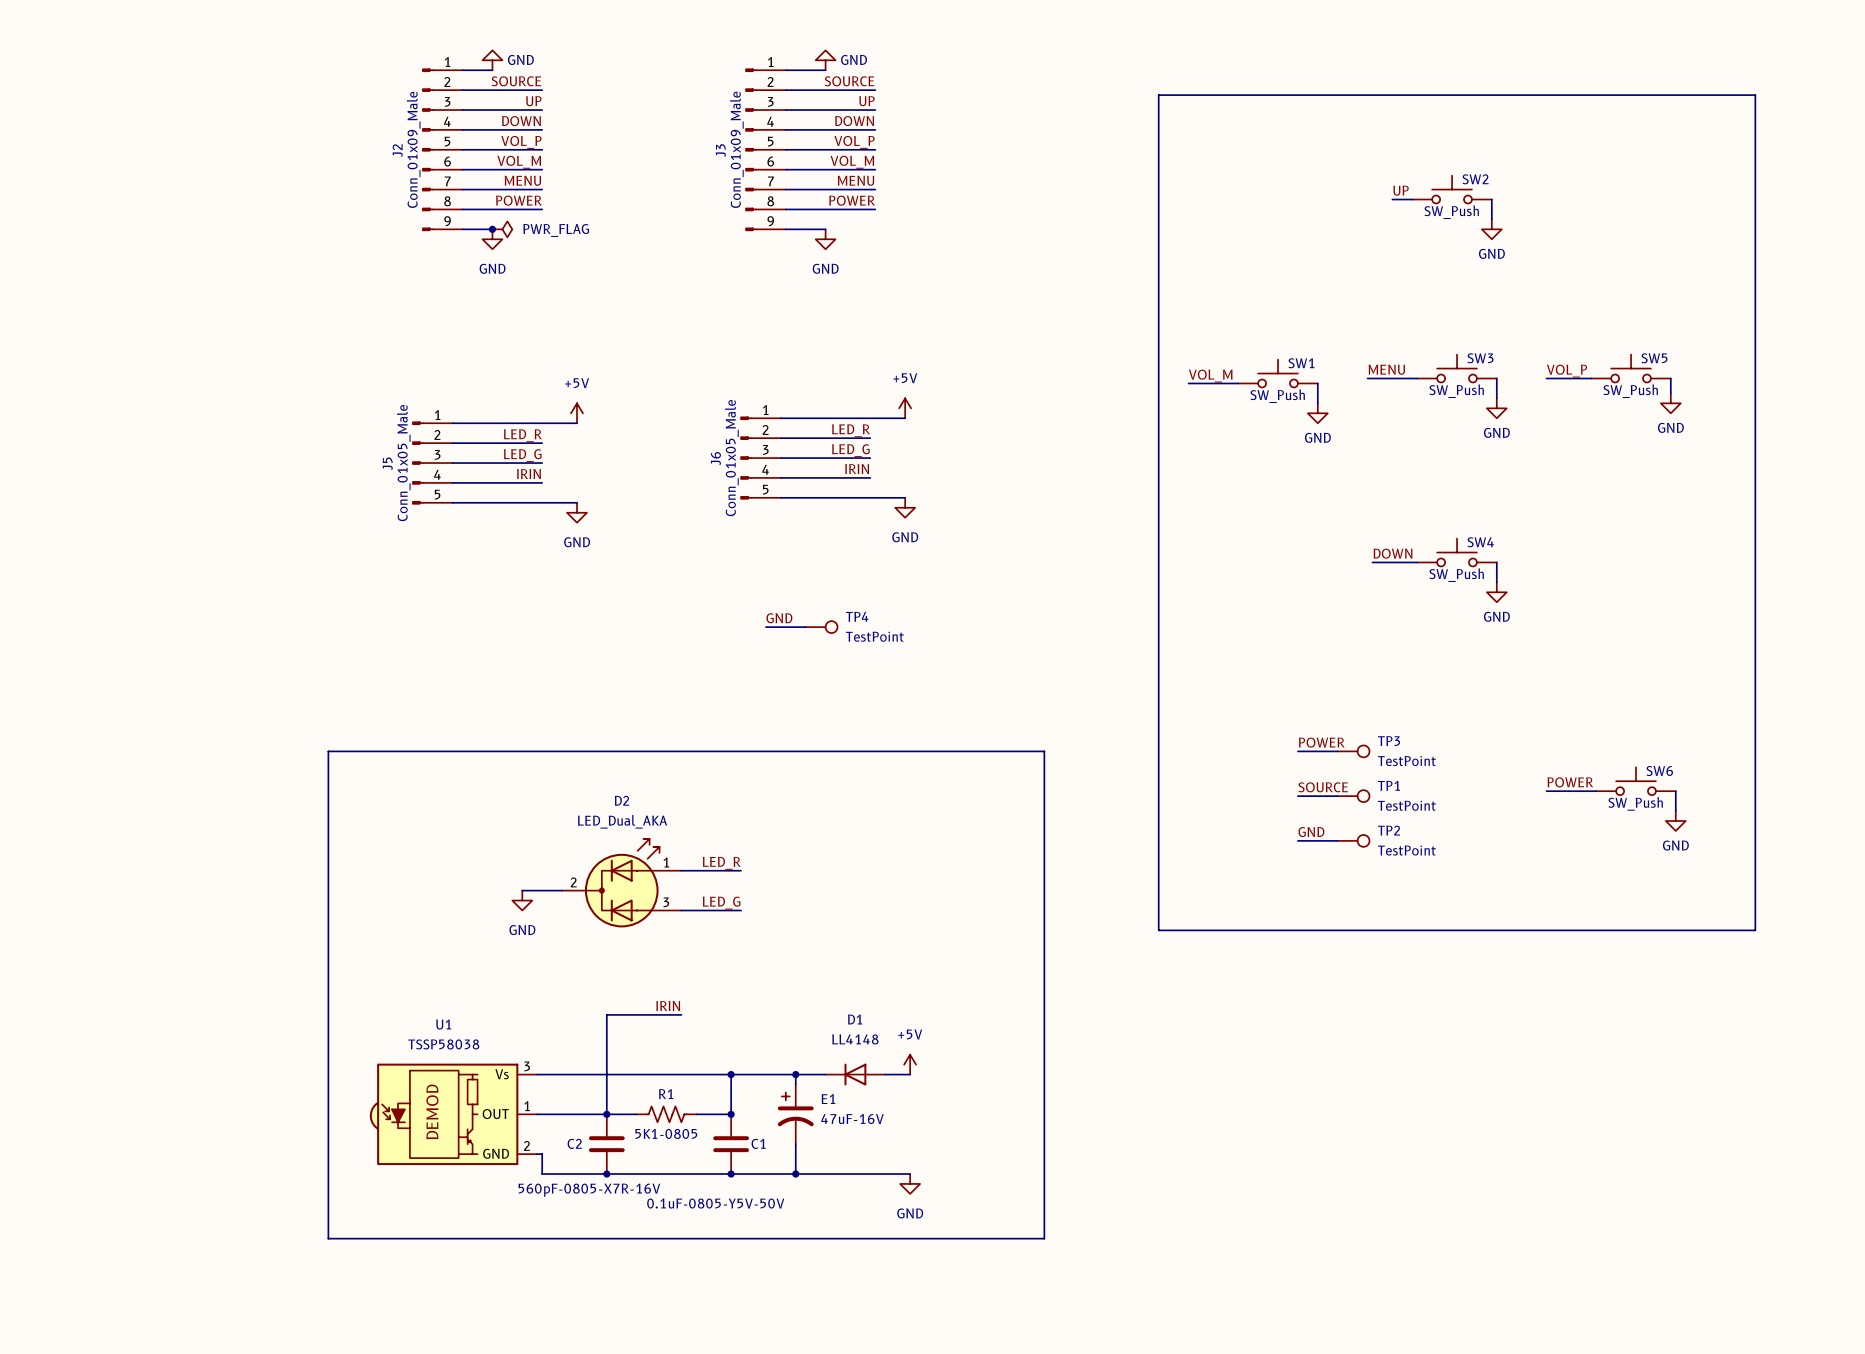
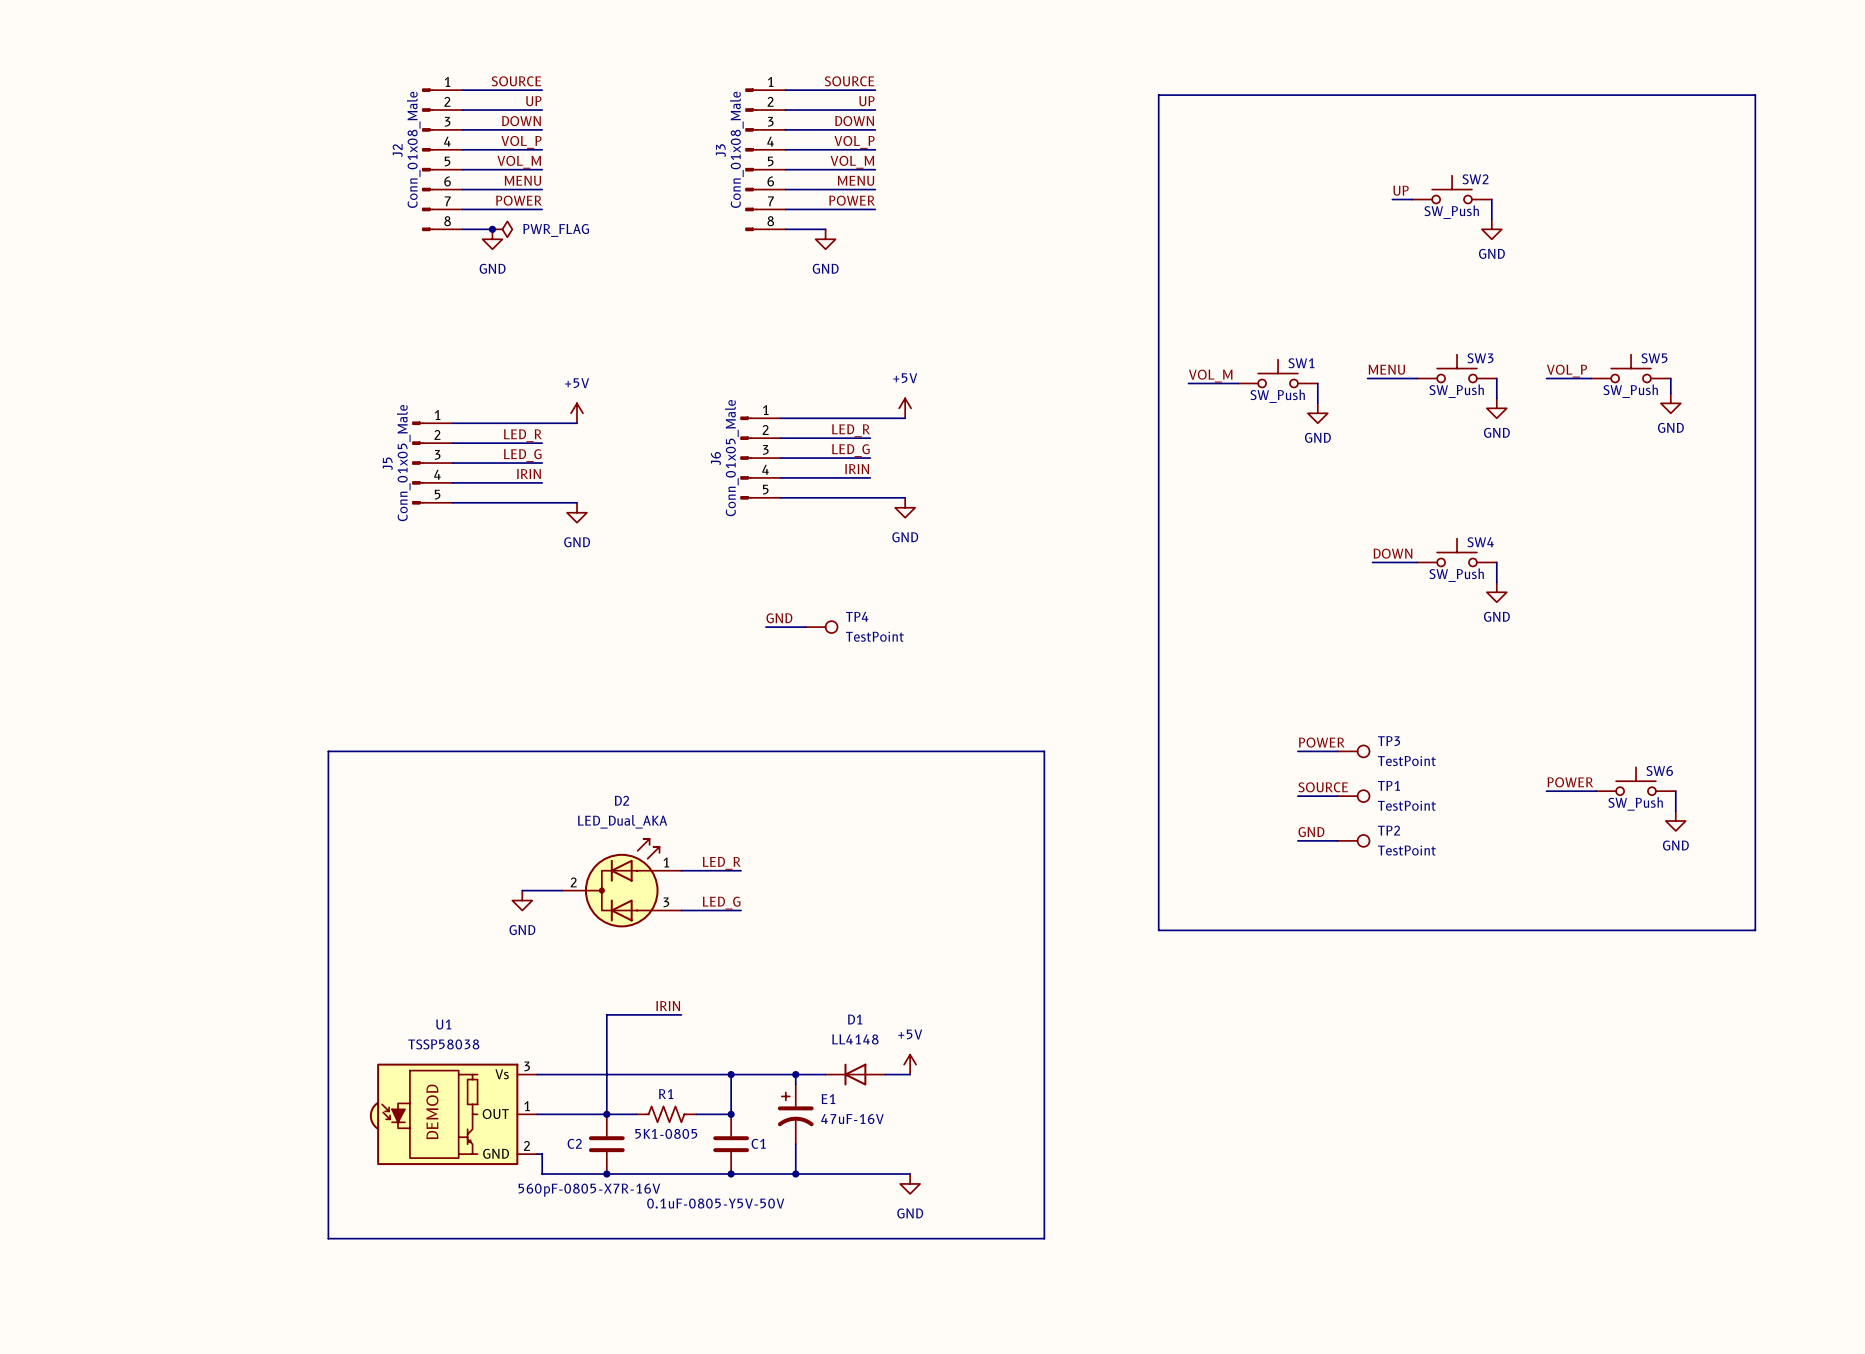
power symbol: GND (492, 60) -> none
power symbol: GND (825, 60) -> none
J2 symbol: [422, 68, 463, 231] -> [422, 88, 463, 231]
J3 symbol: [745, 68, 786, 231] -> [745, 88, 786, 231]
wire: (462, 70) (492, 70) -> none
wire: (785, 70) (825, 70) -> none
J2 value: Conn_01x09_Male (413, 149) -> Conn_01x08_Male (413, 149)
J3 value: Conn_01x09_Male (736, 149) -> Conn_01x08_Male (736, 149)

